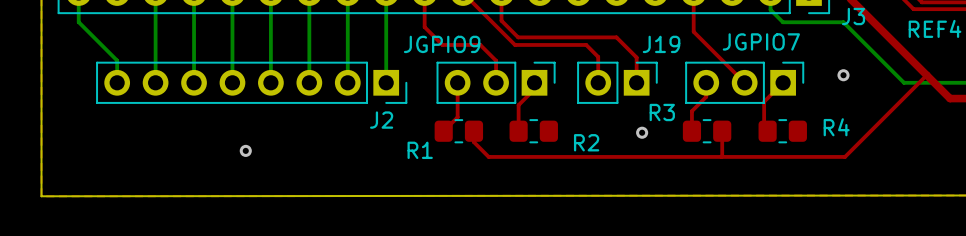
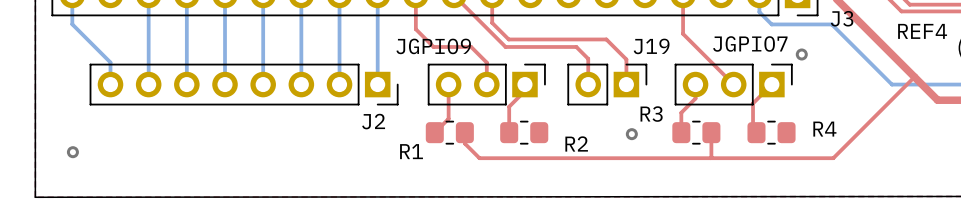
via position: (843, 75) -> (801, 54)
via: none -> (72, 152)
via: (245, 150) -> none

